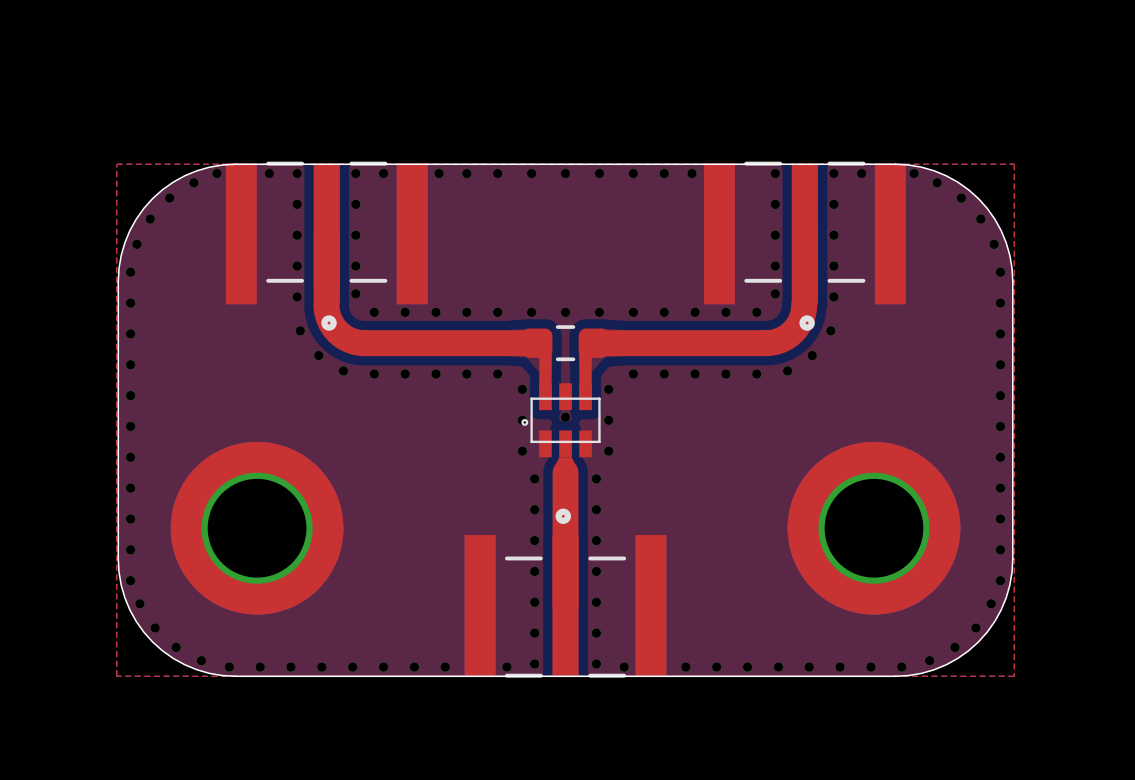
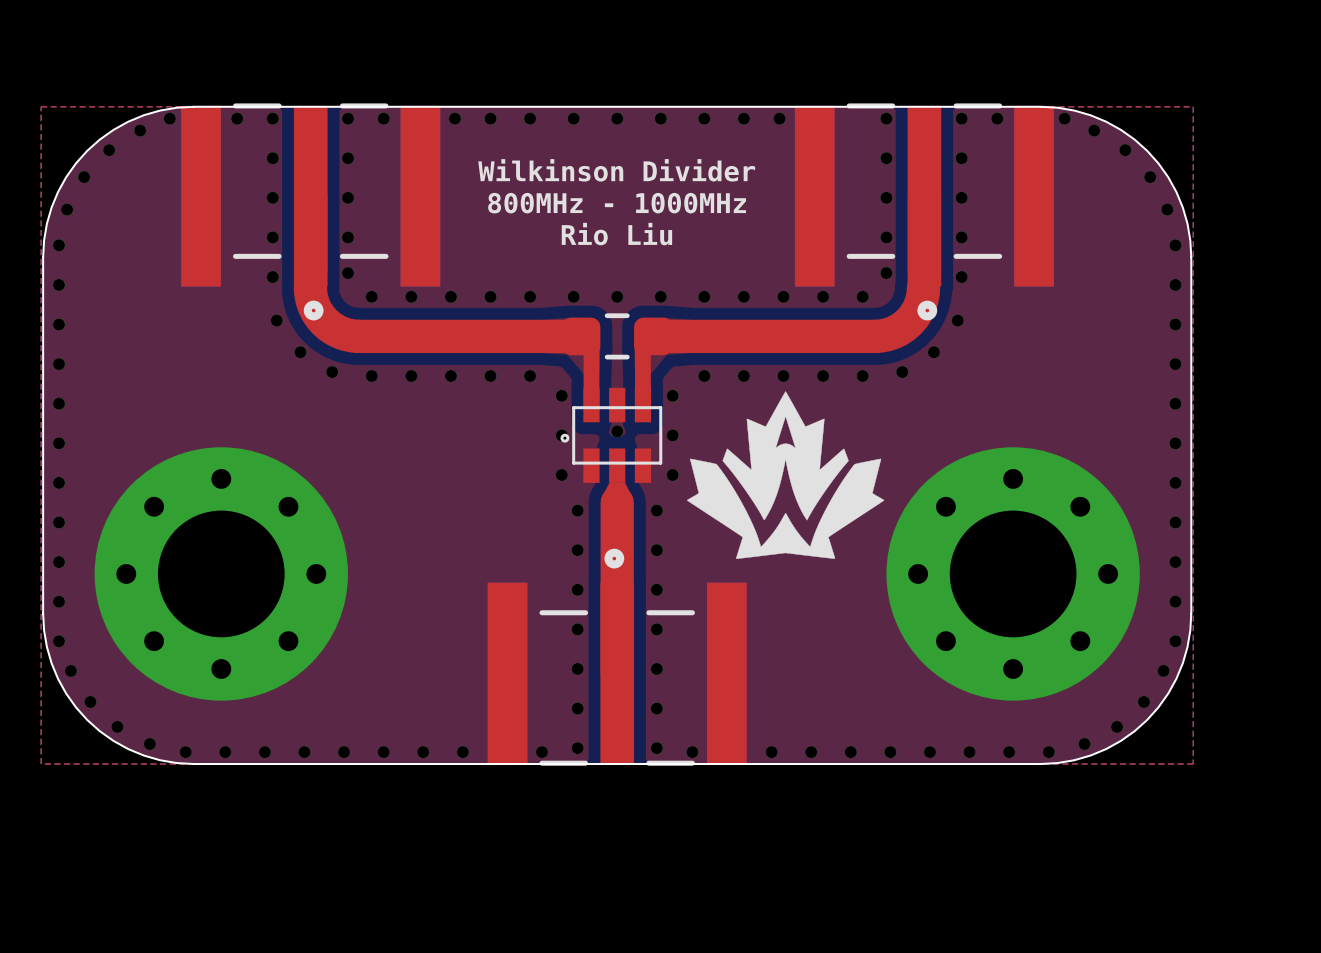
text: none -> Wilkinson Divider (616, 170)
text: none -> 800MHz - 1000MHz (617, 203)
text: none -> Rio Liu (616, 234)
drawing: none -> [686, 391, 885, 559]
part footprint: [170, 441, 344, 615] -> [94, 447, 348, 701]
part footprint: [787, 441, 961, 615] -> [886, 447, 1140, 701]

